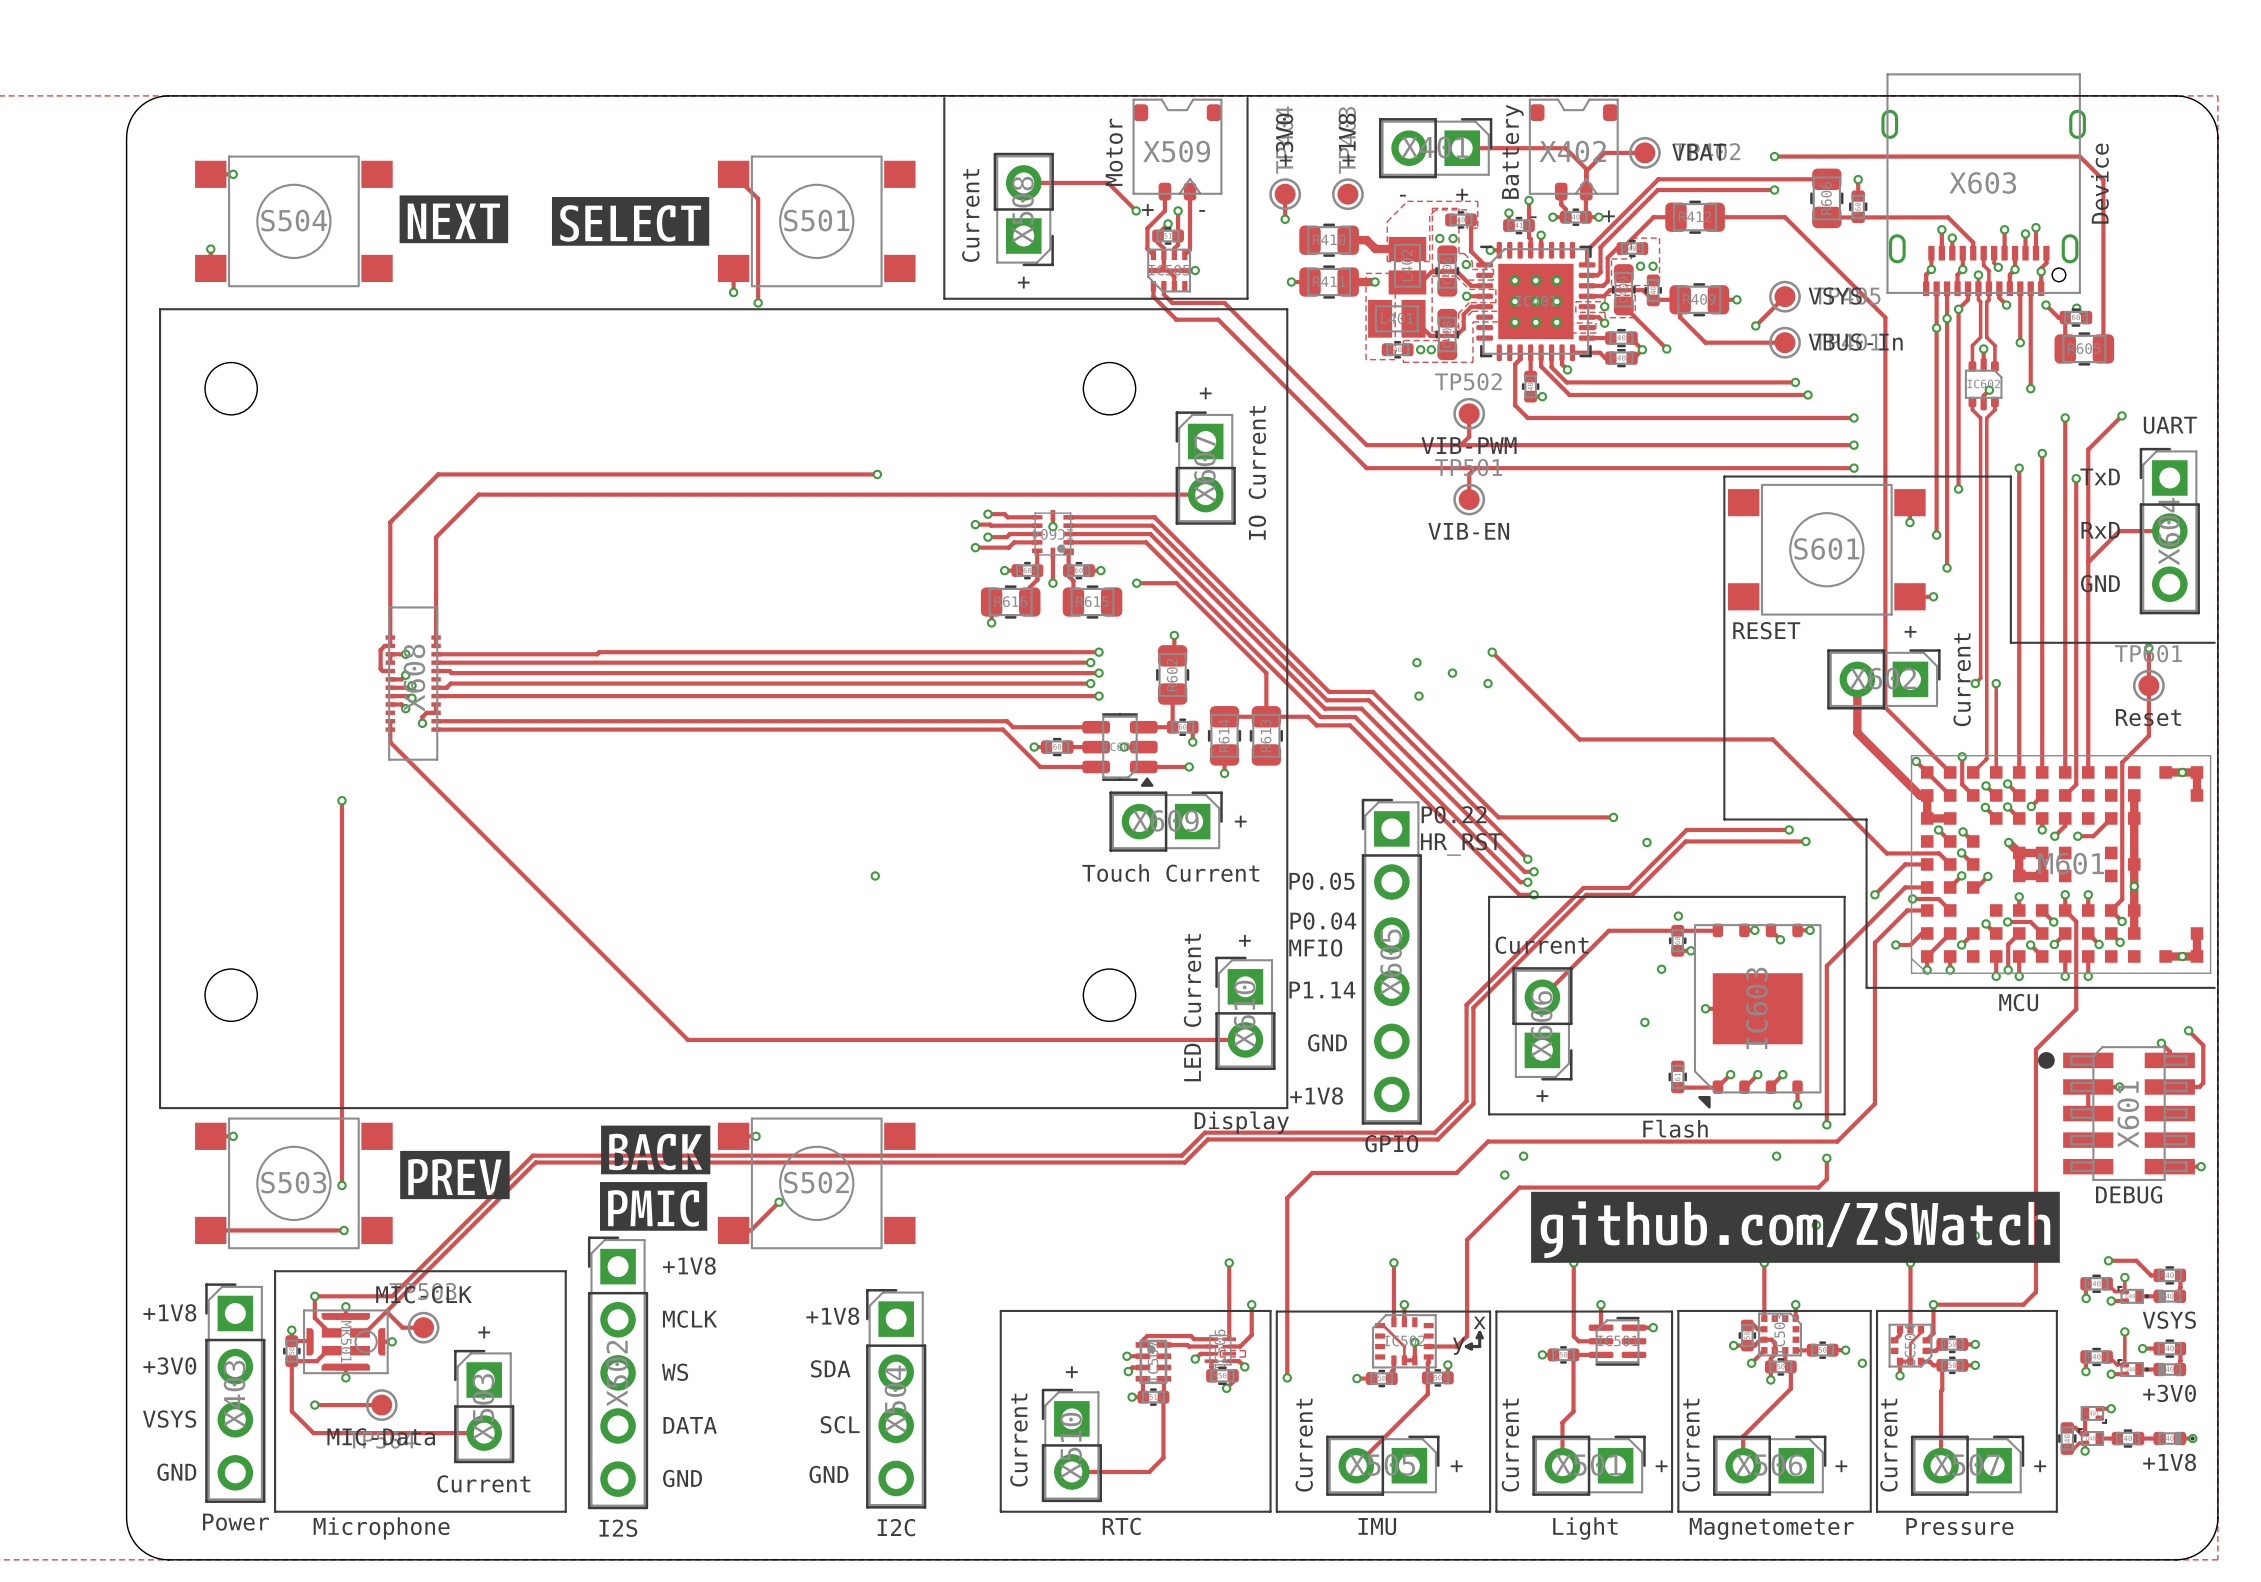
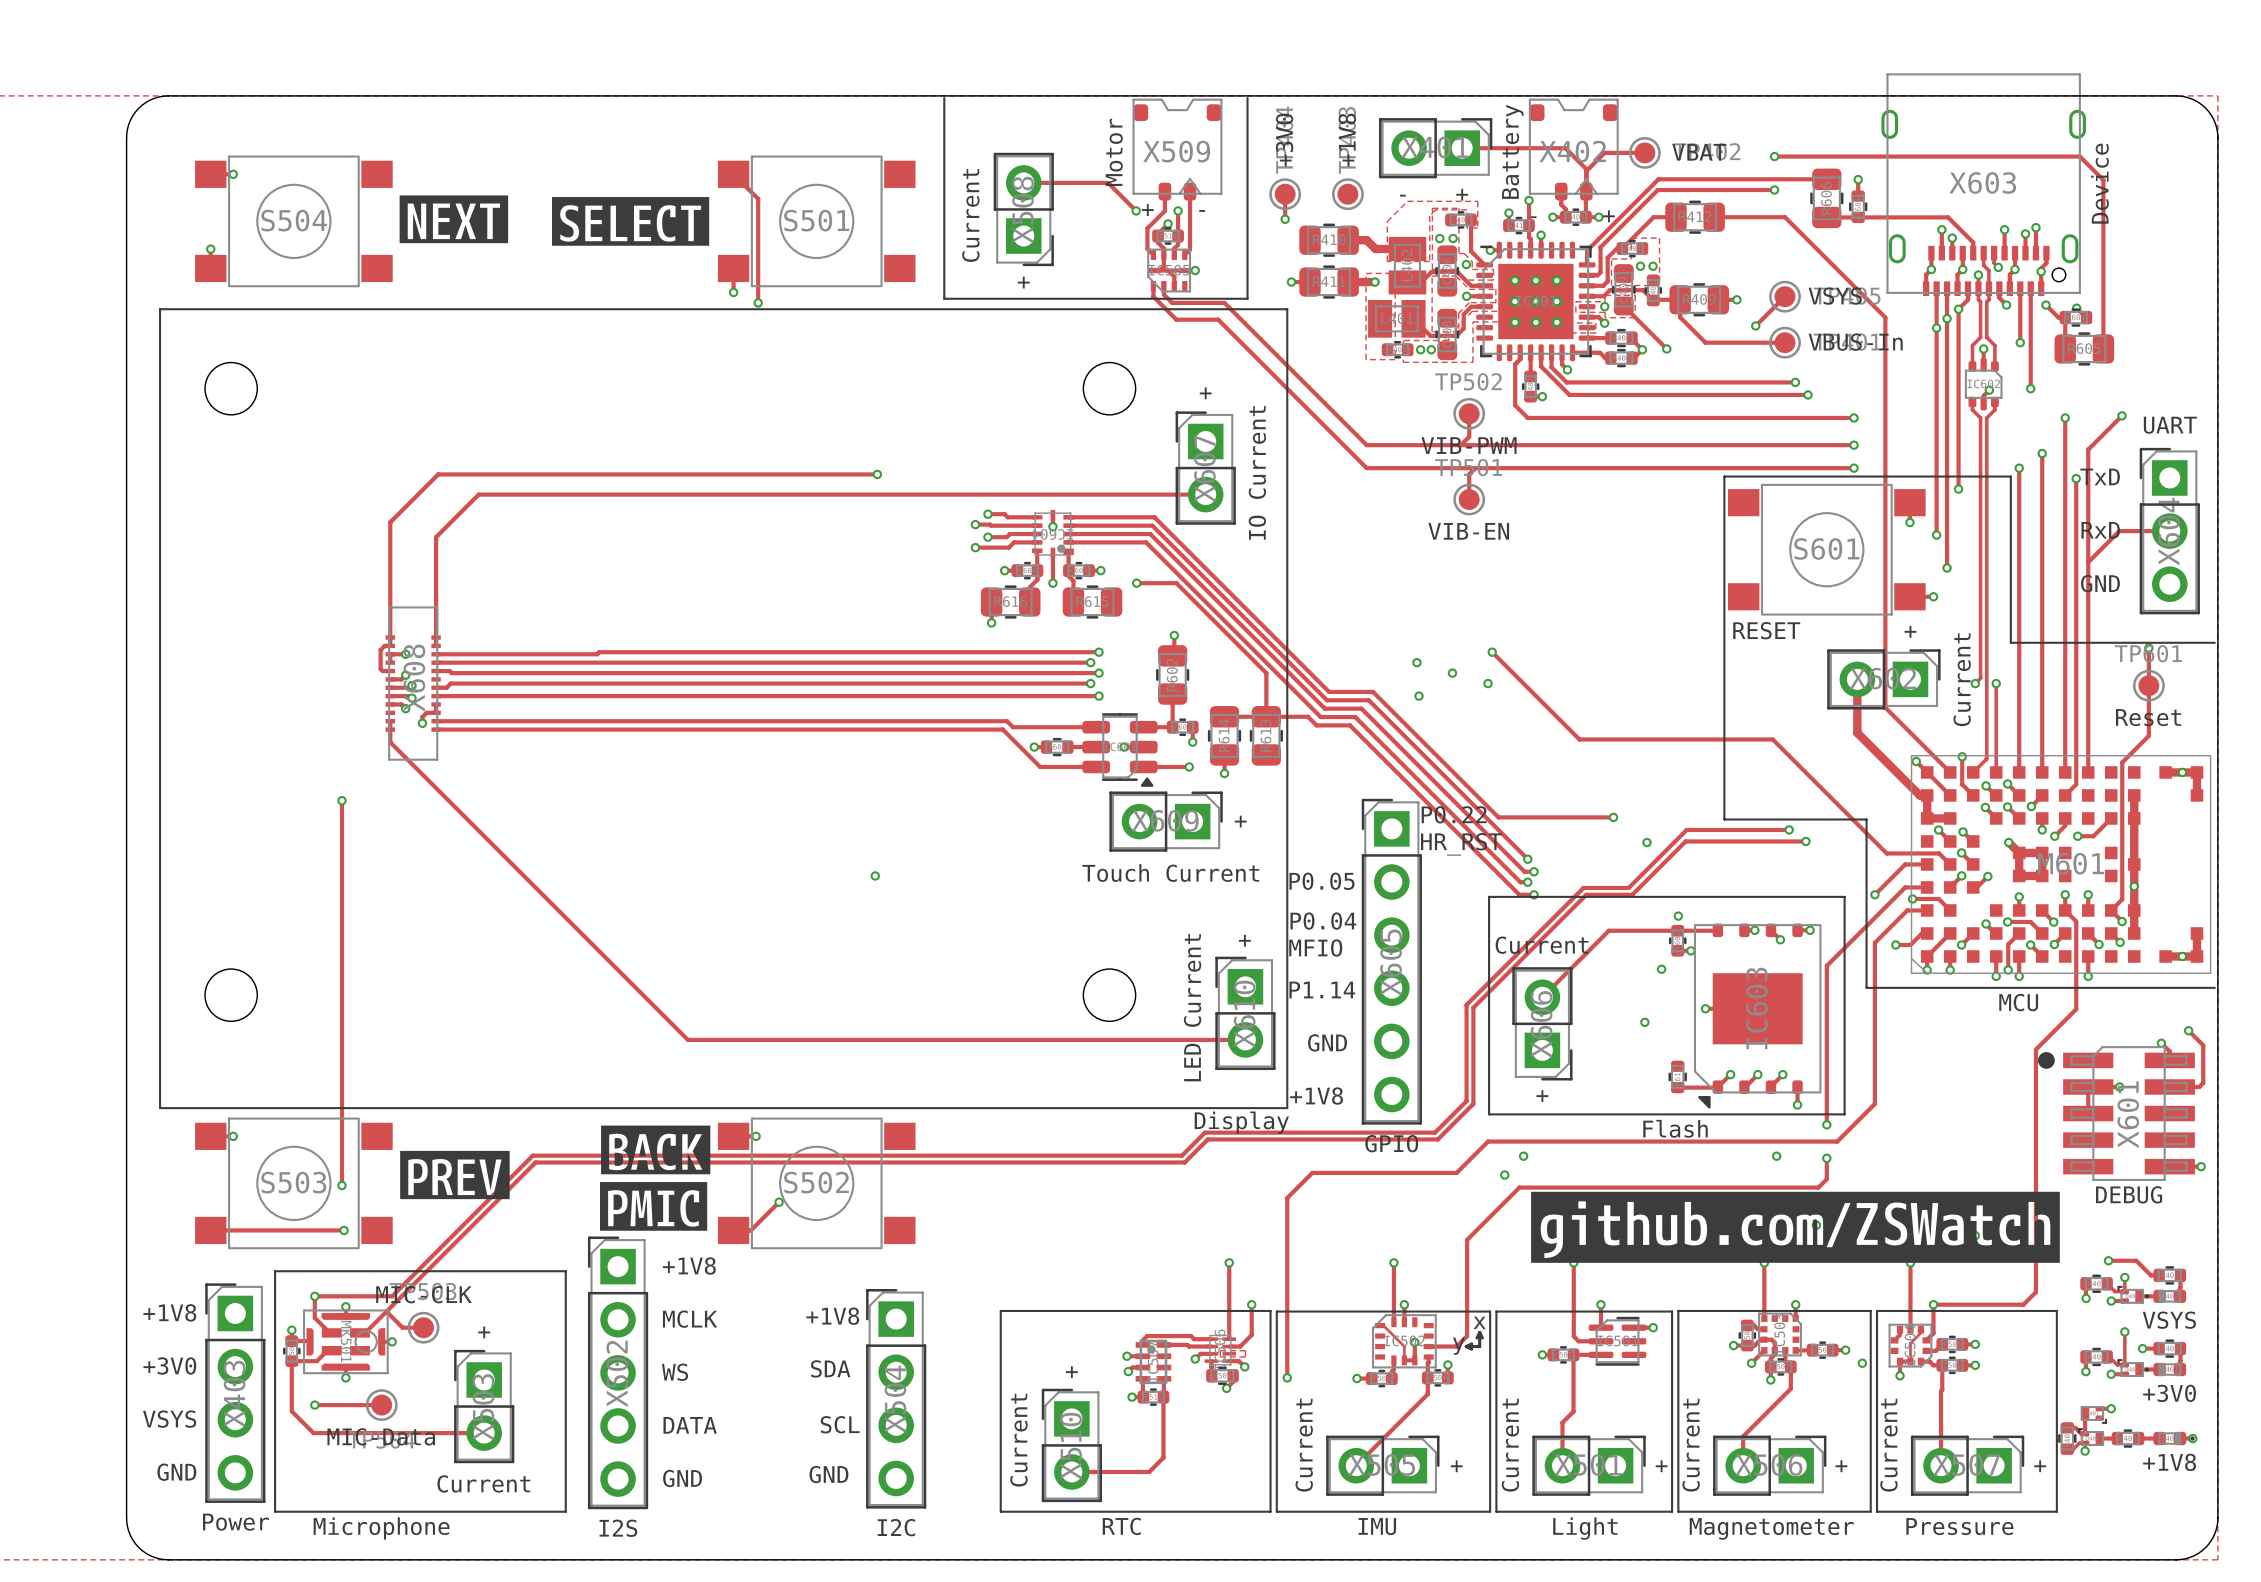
track: (2065, 956) (2065, 976) -> none
via: (2065, 976) -> none

